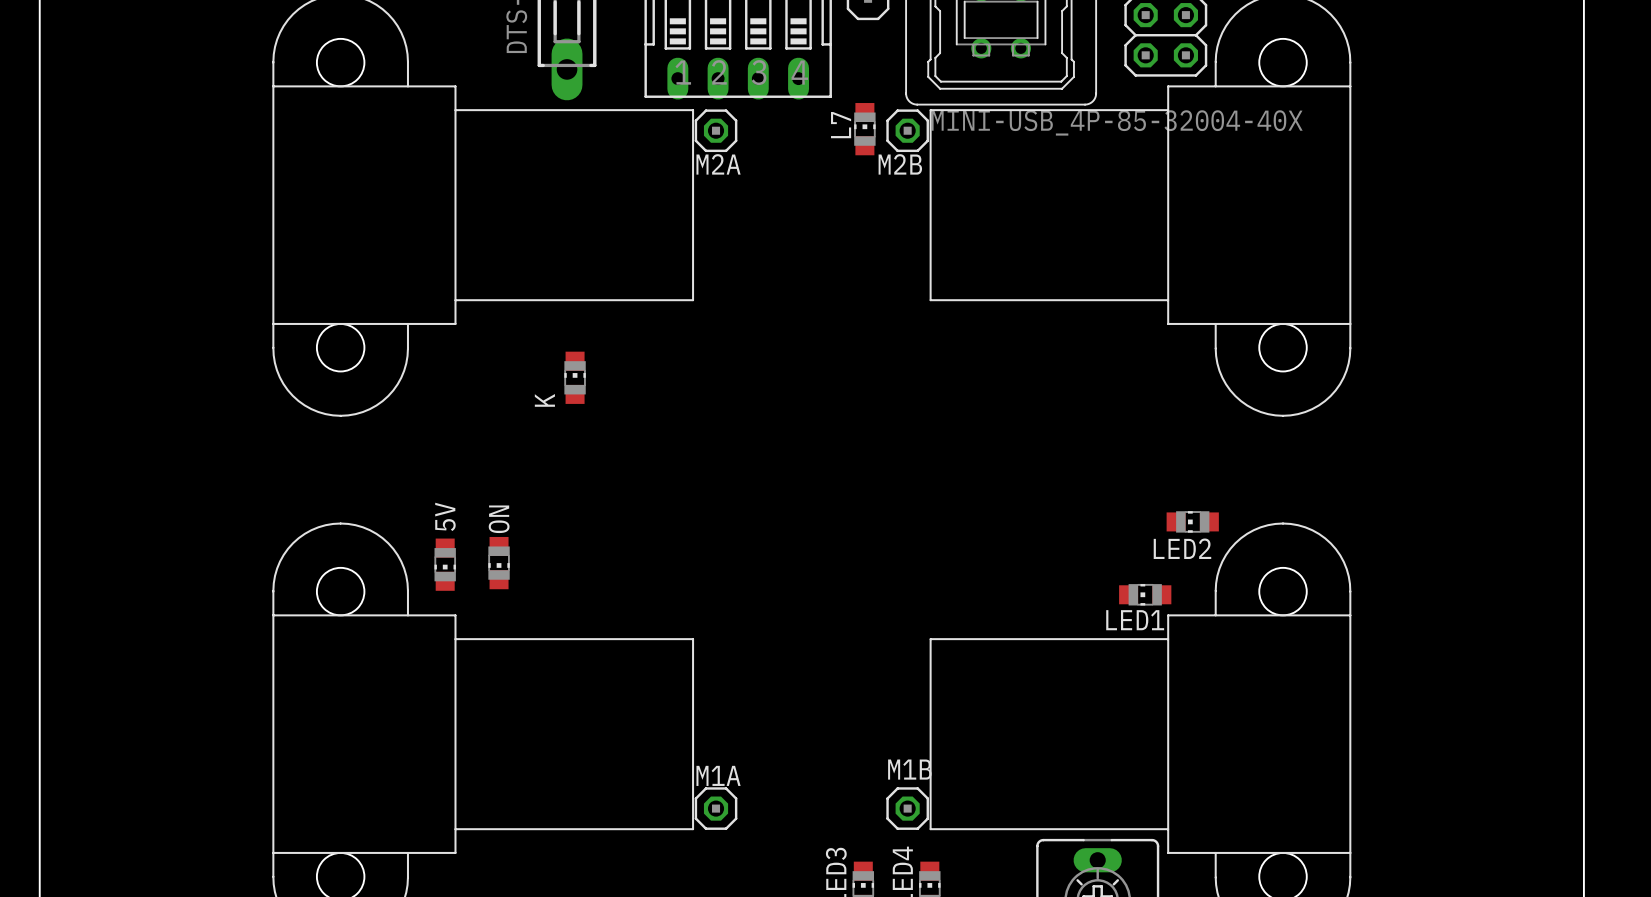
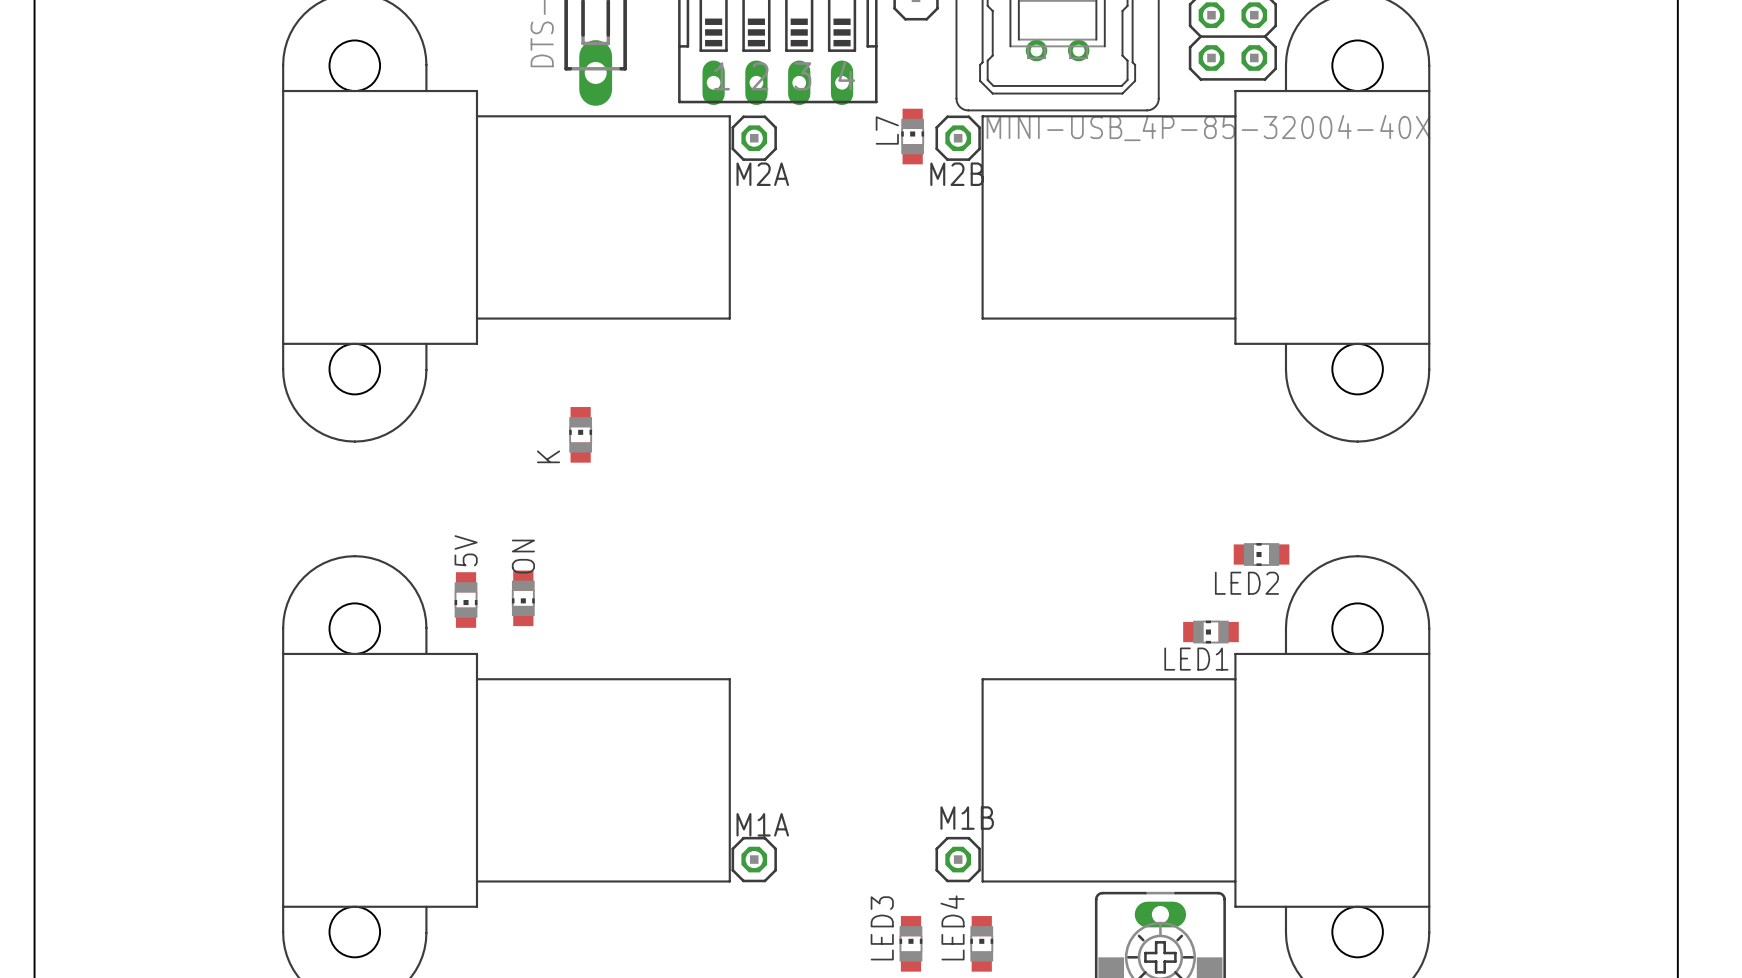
K position: (575, 377) -> (580, 434)

